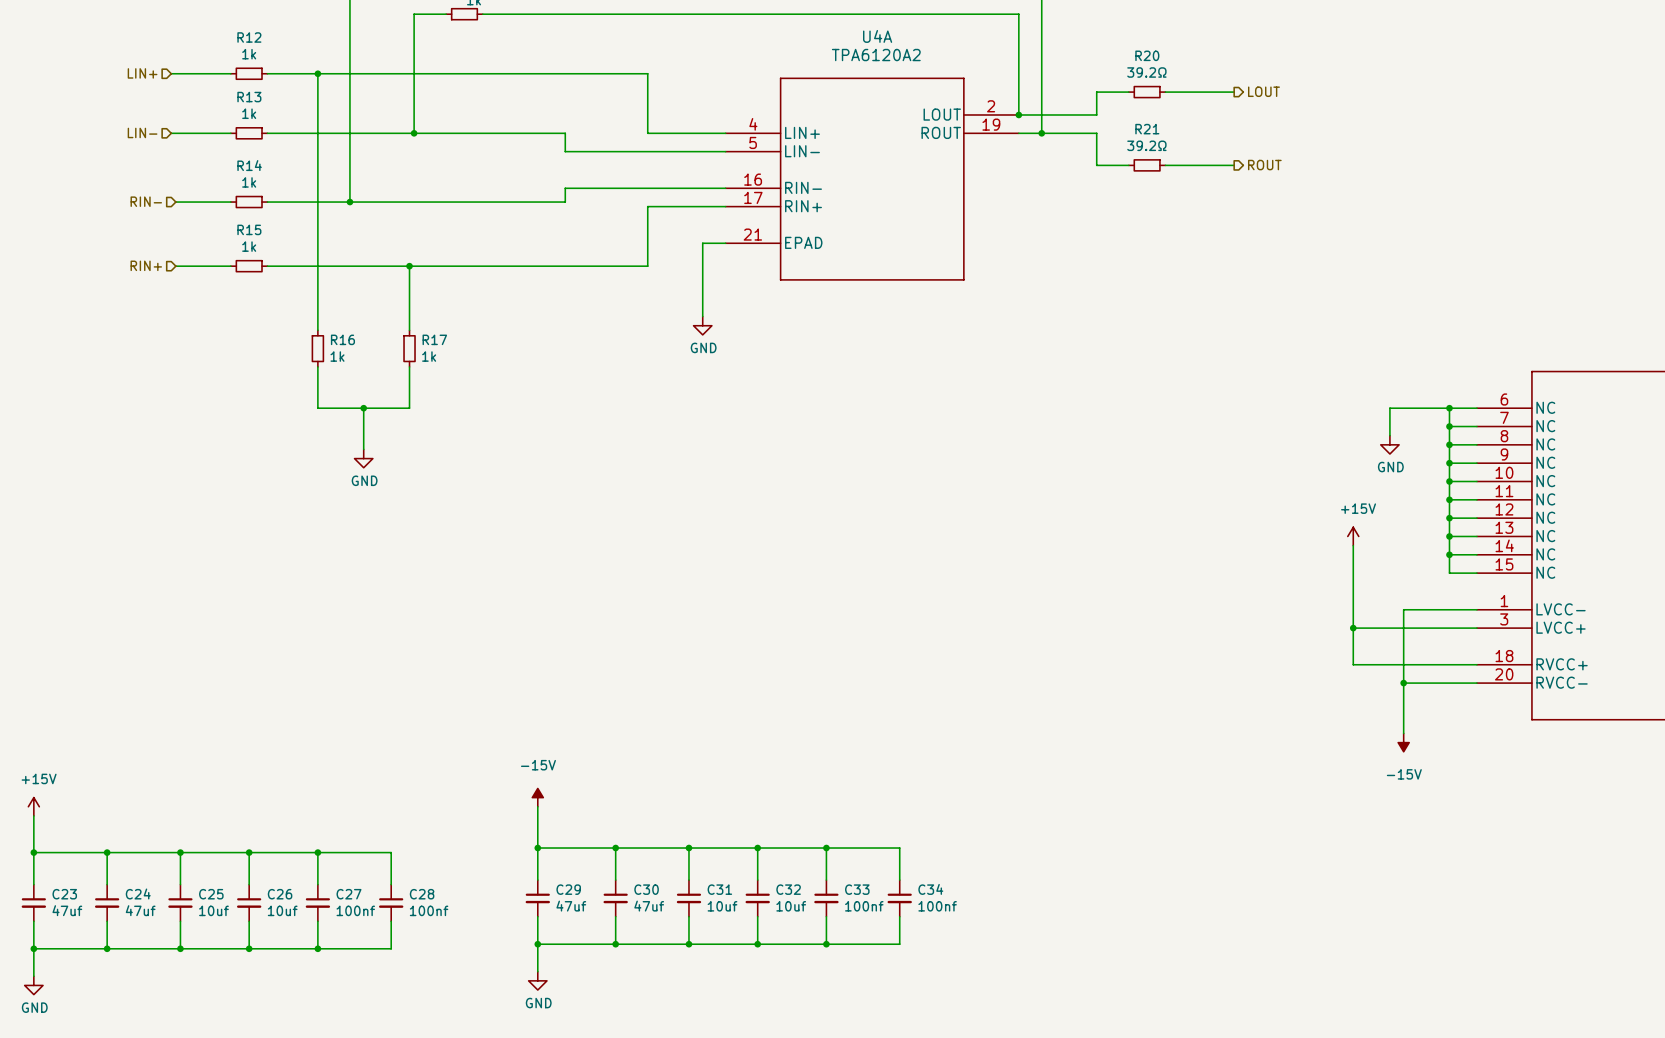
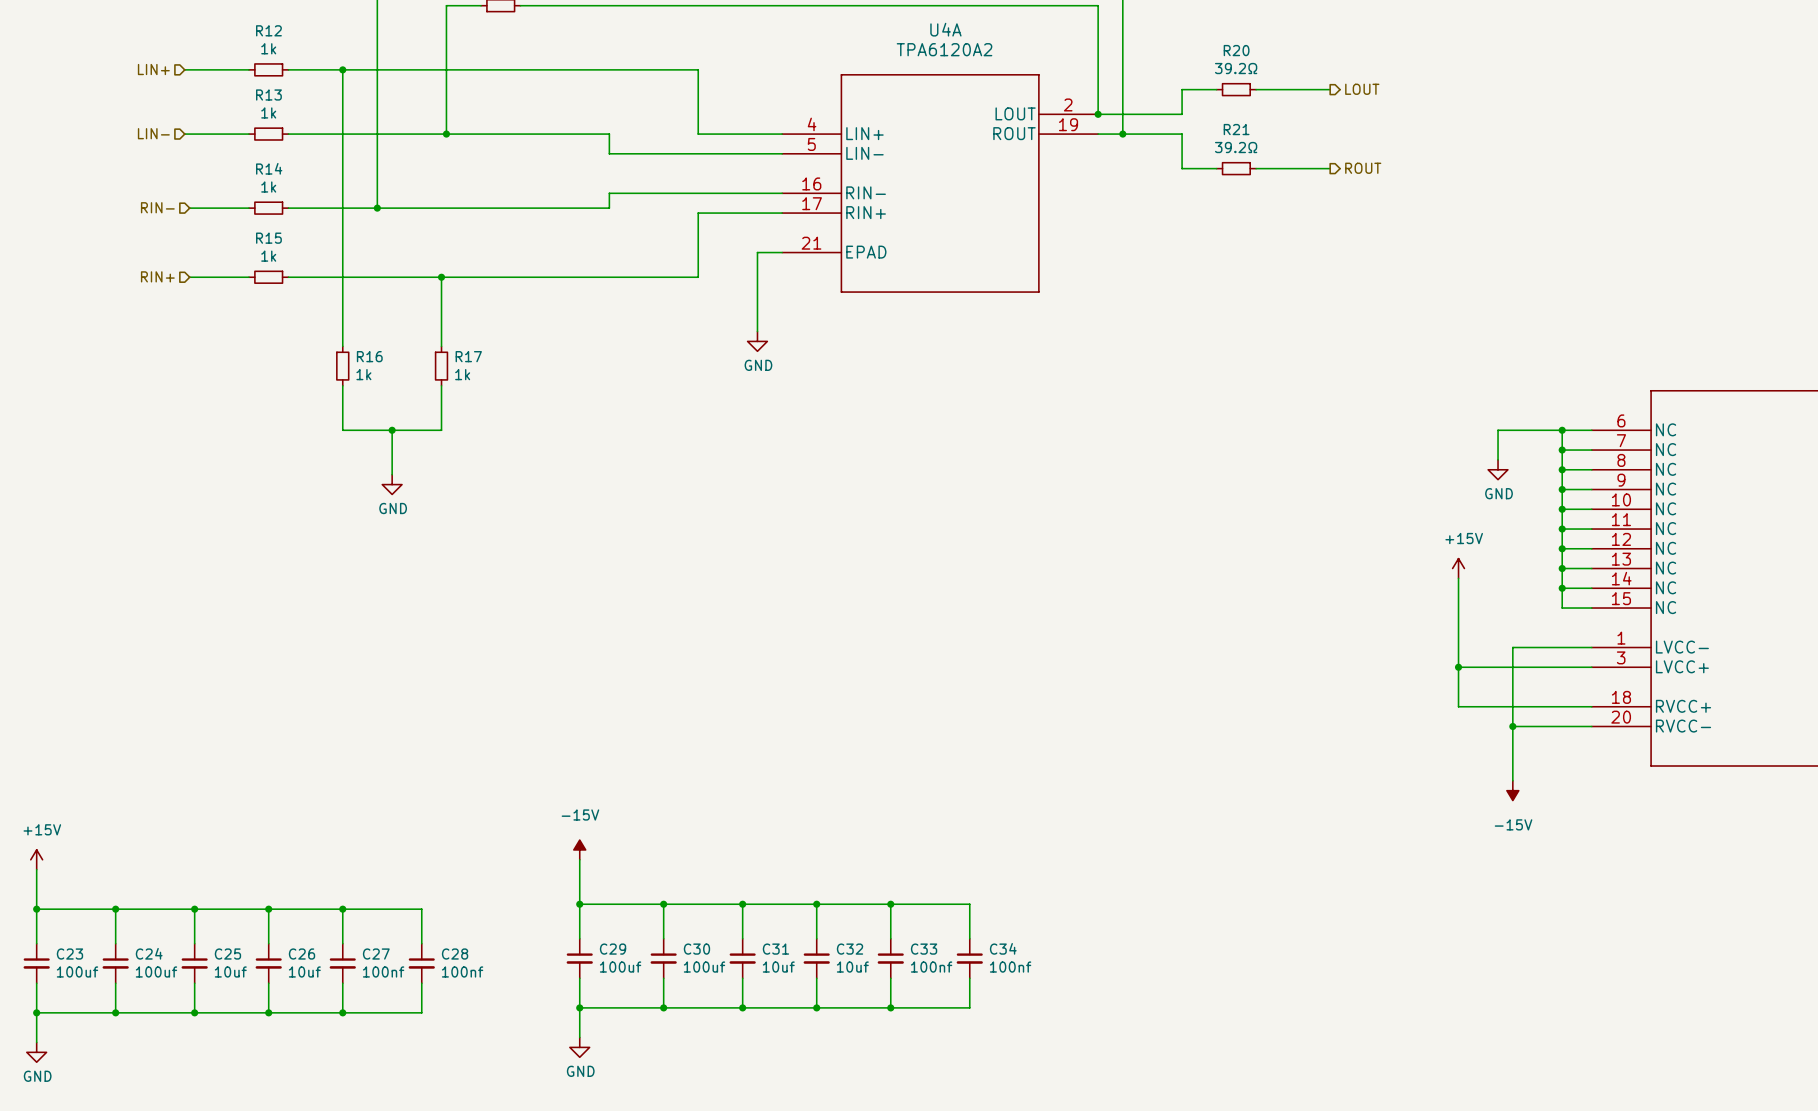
C29 value: 47uf (571, 906) -> 100uf (620, 967)
C30 value: 47uf (649, 906) -> 100uf (704, 967)
C23 value: 47uf (67, 910) -> 100uf (77, 971)
C24 value: 47uf (140, 910) -> 100uf (156, 971)

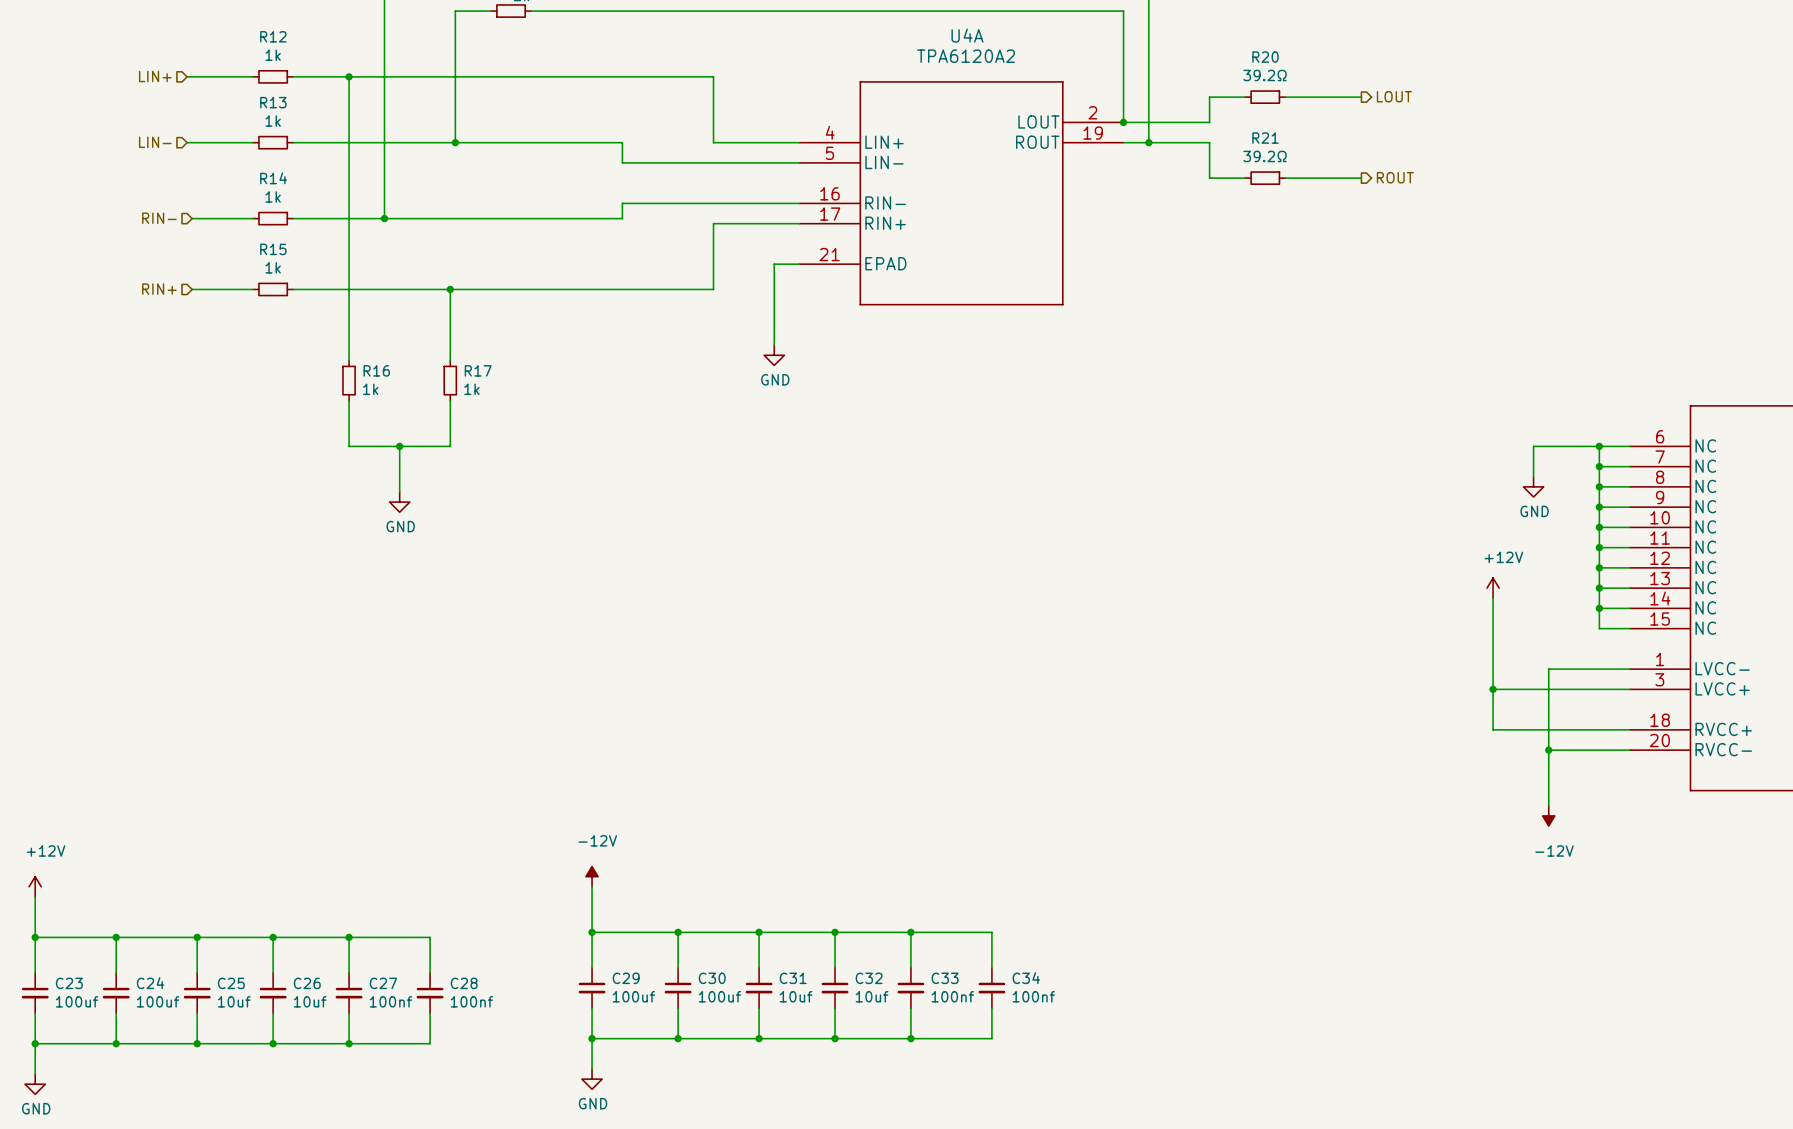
power symbol: +15V (1458, 568) -> +12V (1493, 588)
power symbol: -15V (1512, 790) -> -12V (1548, 815)
power symbol: -15V (579, 849) -> -12V (592, 876)
power symbol: +15V (36, 859) -> +12V (35, 886)

